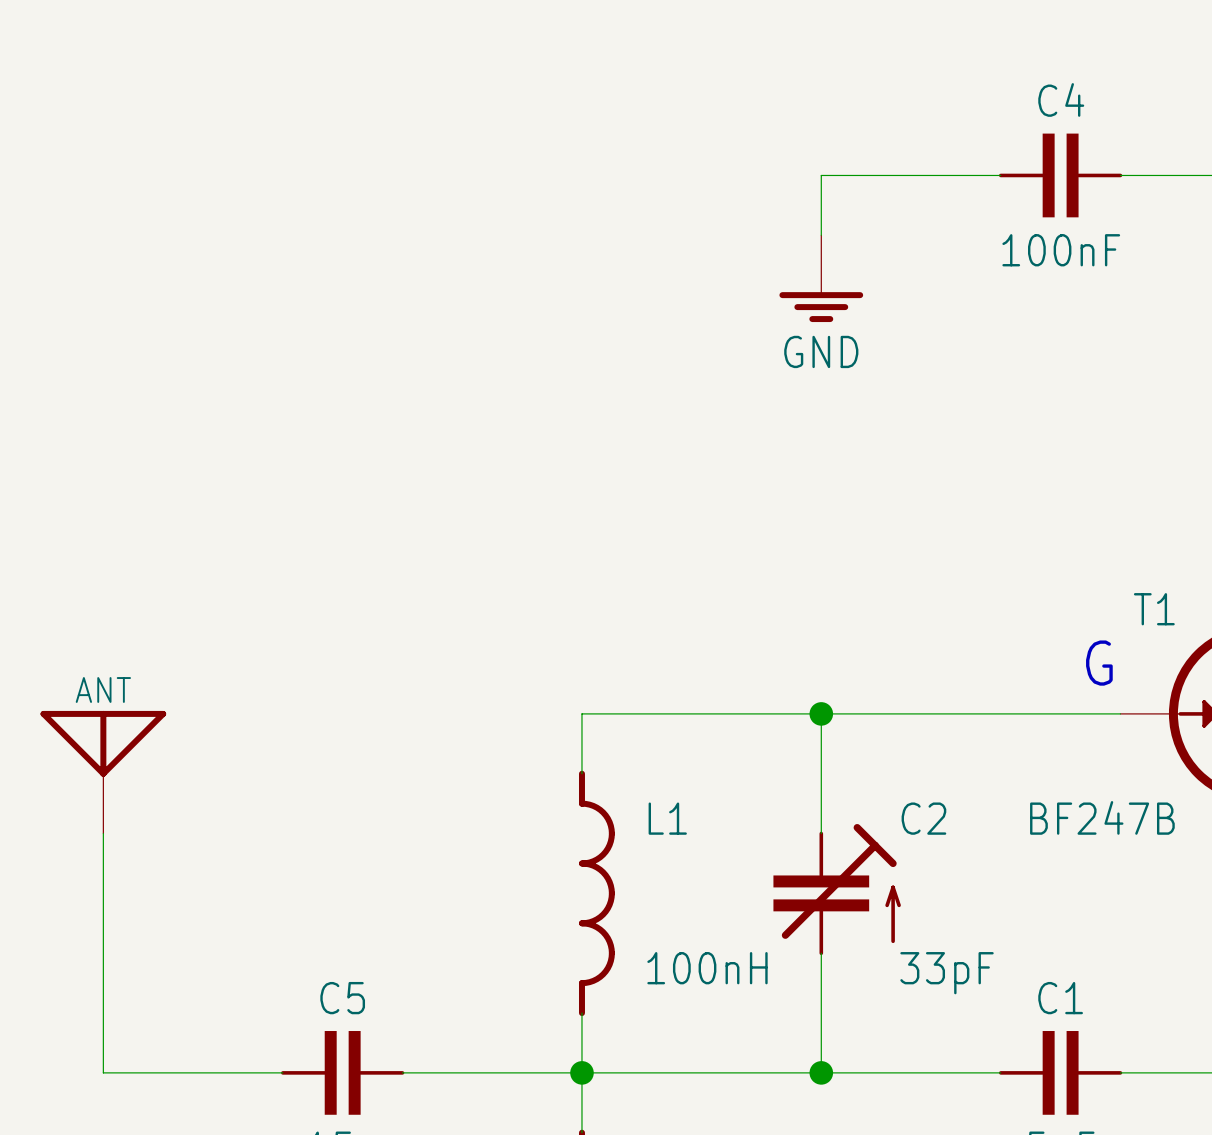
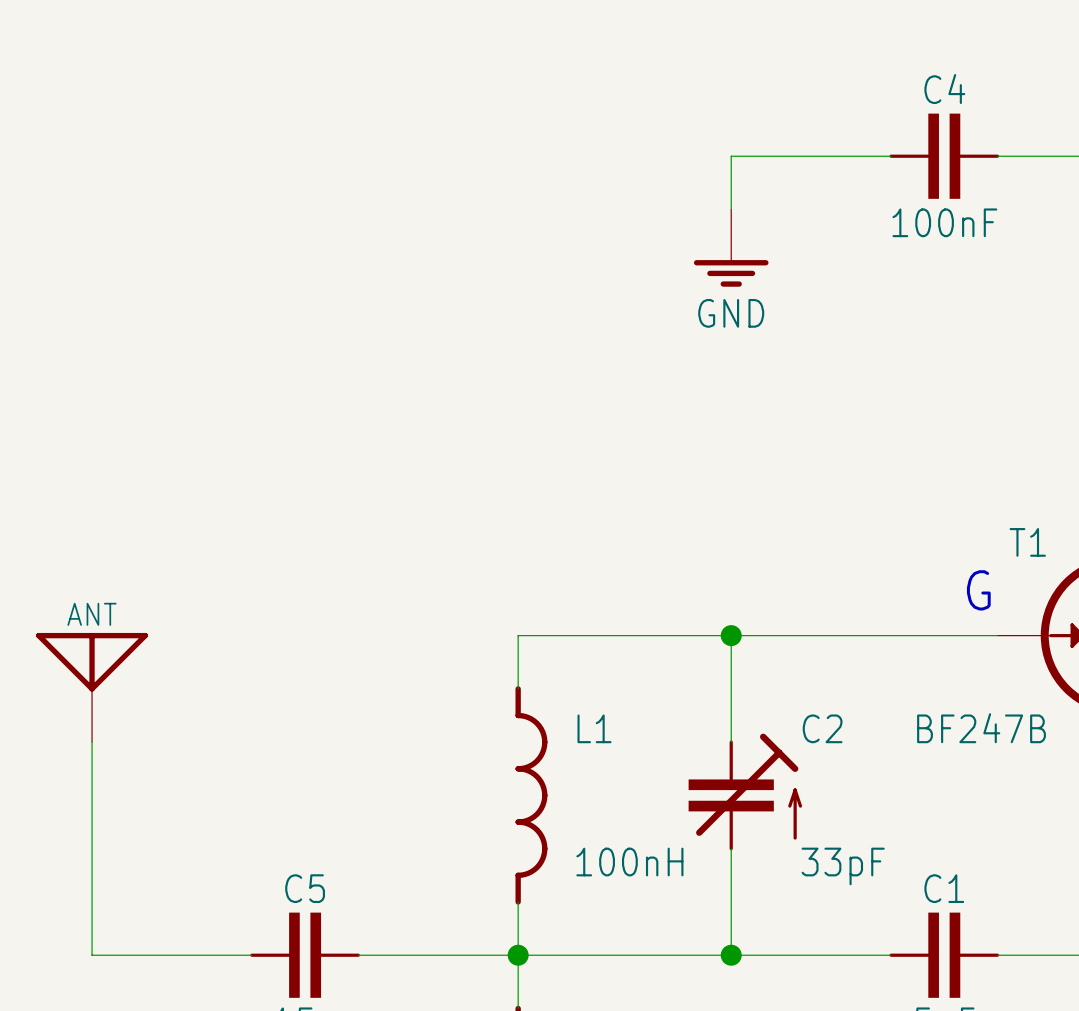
C4 symbol: [998, 133, 1123, 218] -> [889, 113, 1000, 199]
C5 symbol: [281, 1031, 405, 1115] -> [250, 912, 360, 998]
C1 symbol: [998, 1031, 1123, 1115] -> [889, 912, 1000, 998]

